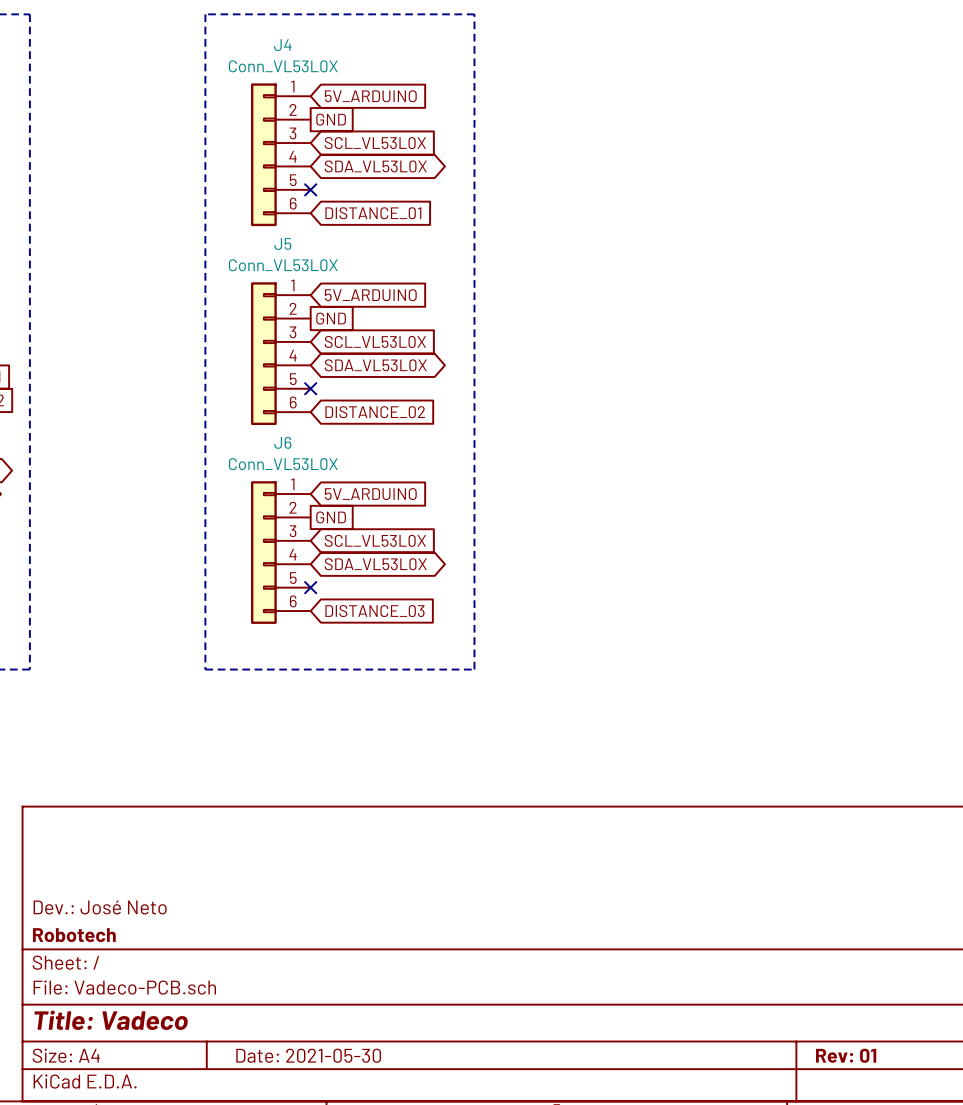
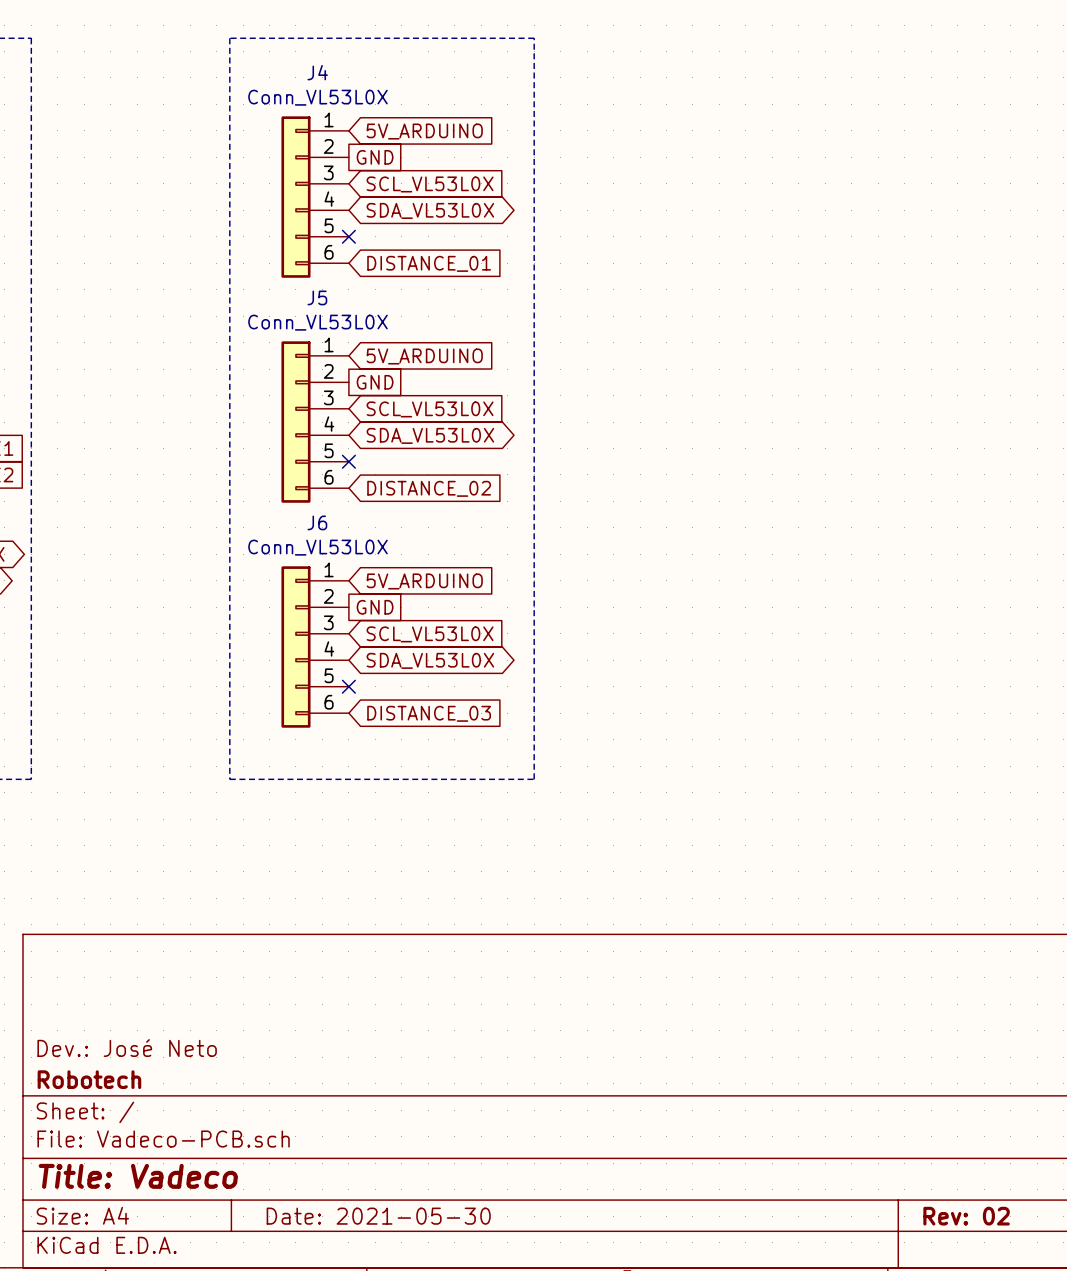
title block: Rev: 01 (846, 1055) -> Rev: 02 (966, 1216)

